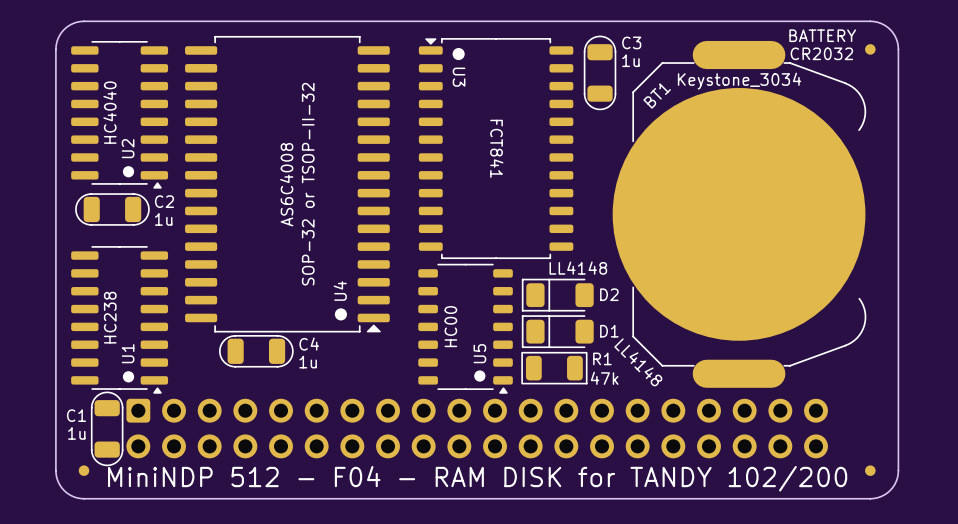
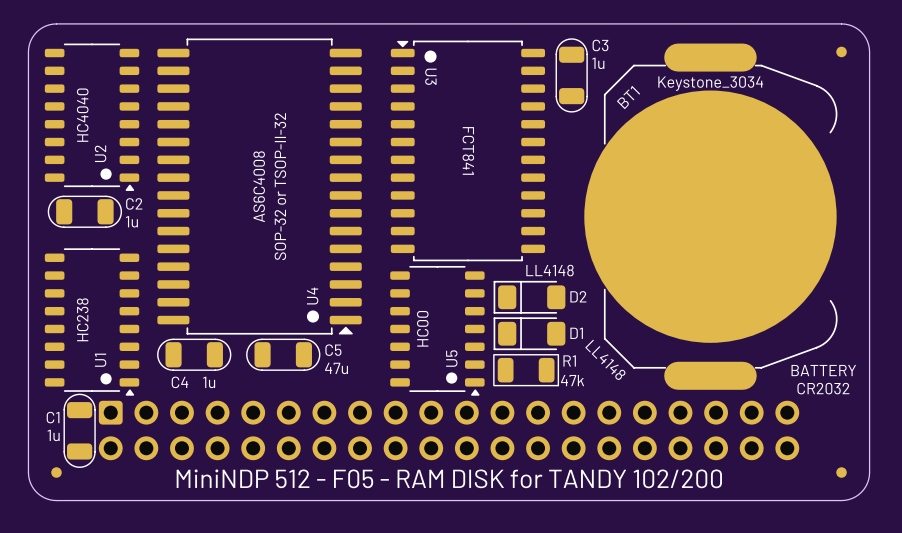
text position: BATTERY (822, 35) -> BATTERY (823, 370)
U2 footprint: [71, 40, 169, 189] -> [44, 43, 140, 191]
text position: CR2032 (821, 53) -> CR2032 (823, 388)
U1 footprint: [71, 246, 169, 394] -> [44, 248, 140, 396]
C4 name position: C4 (309, 344) -> C4 (179, 382)
C4 position: (256, 351) -> (194, 354)
C5: none -> 47u (283, 354)
C4 value position: 1u (308, 362) -> 1u (209, 382)
text: MiniNDP 512 - F04 - RAM DISK for TANDY 102/200 (477, 478) -> MiniNDP 512 - F05 - RAM DISK for TANDY 102/200 (449, 478)

